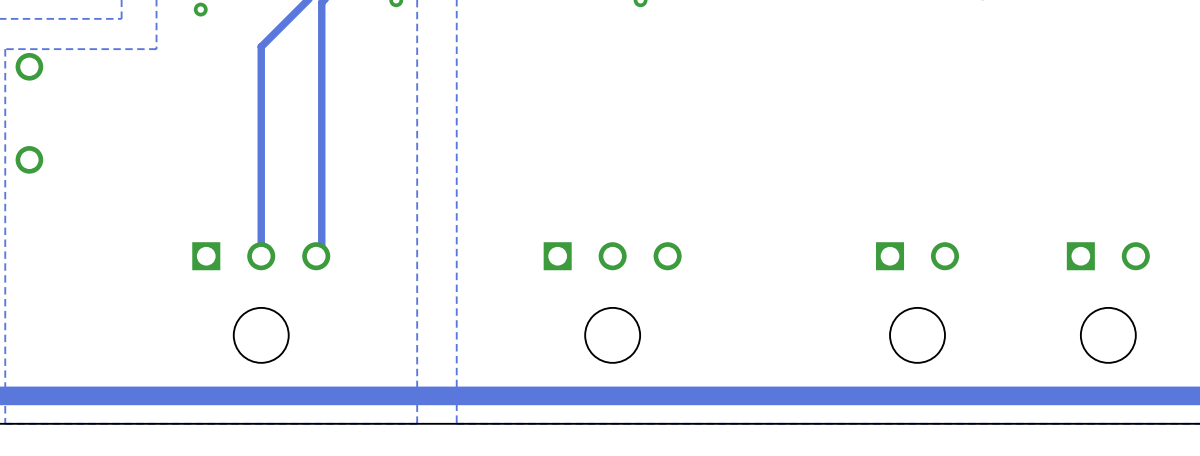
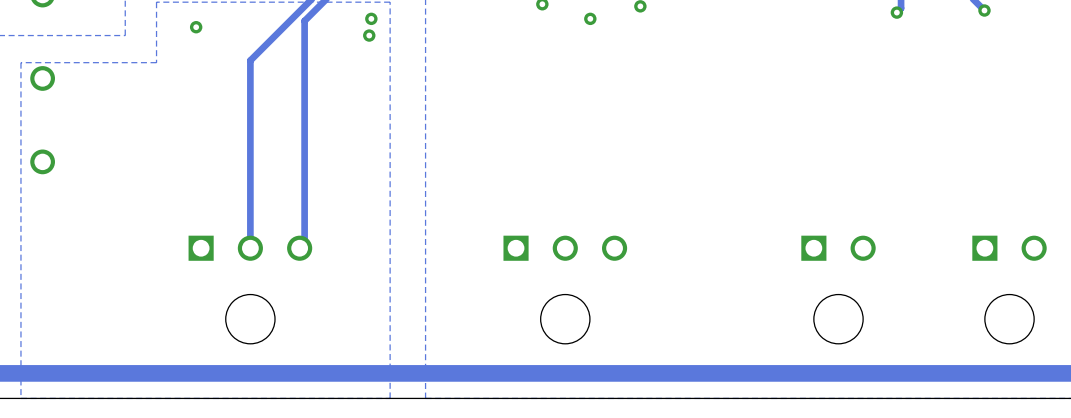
via: none -> (369, 35)

